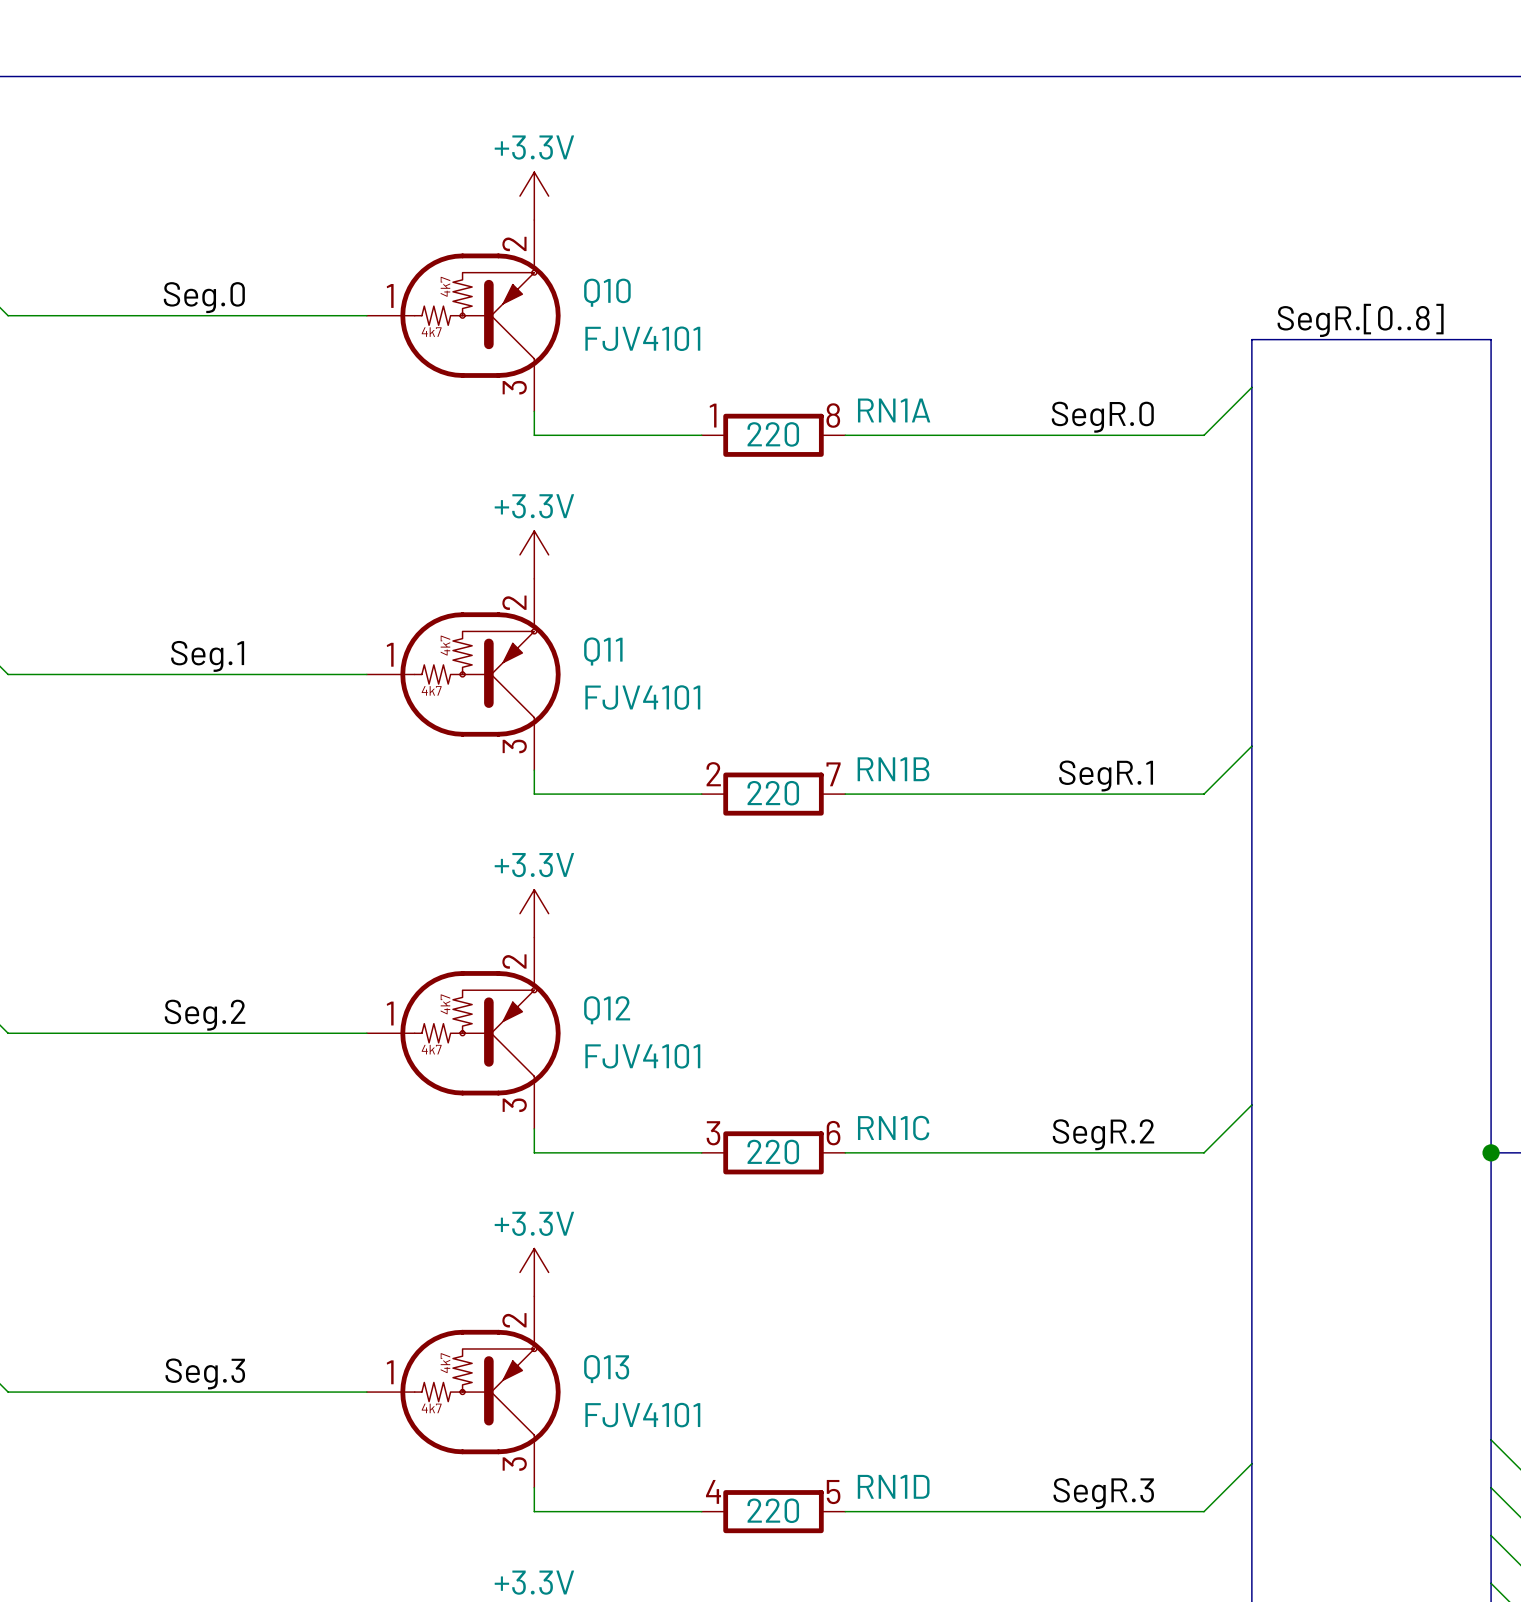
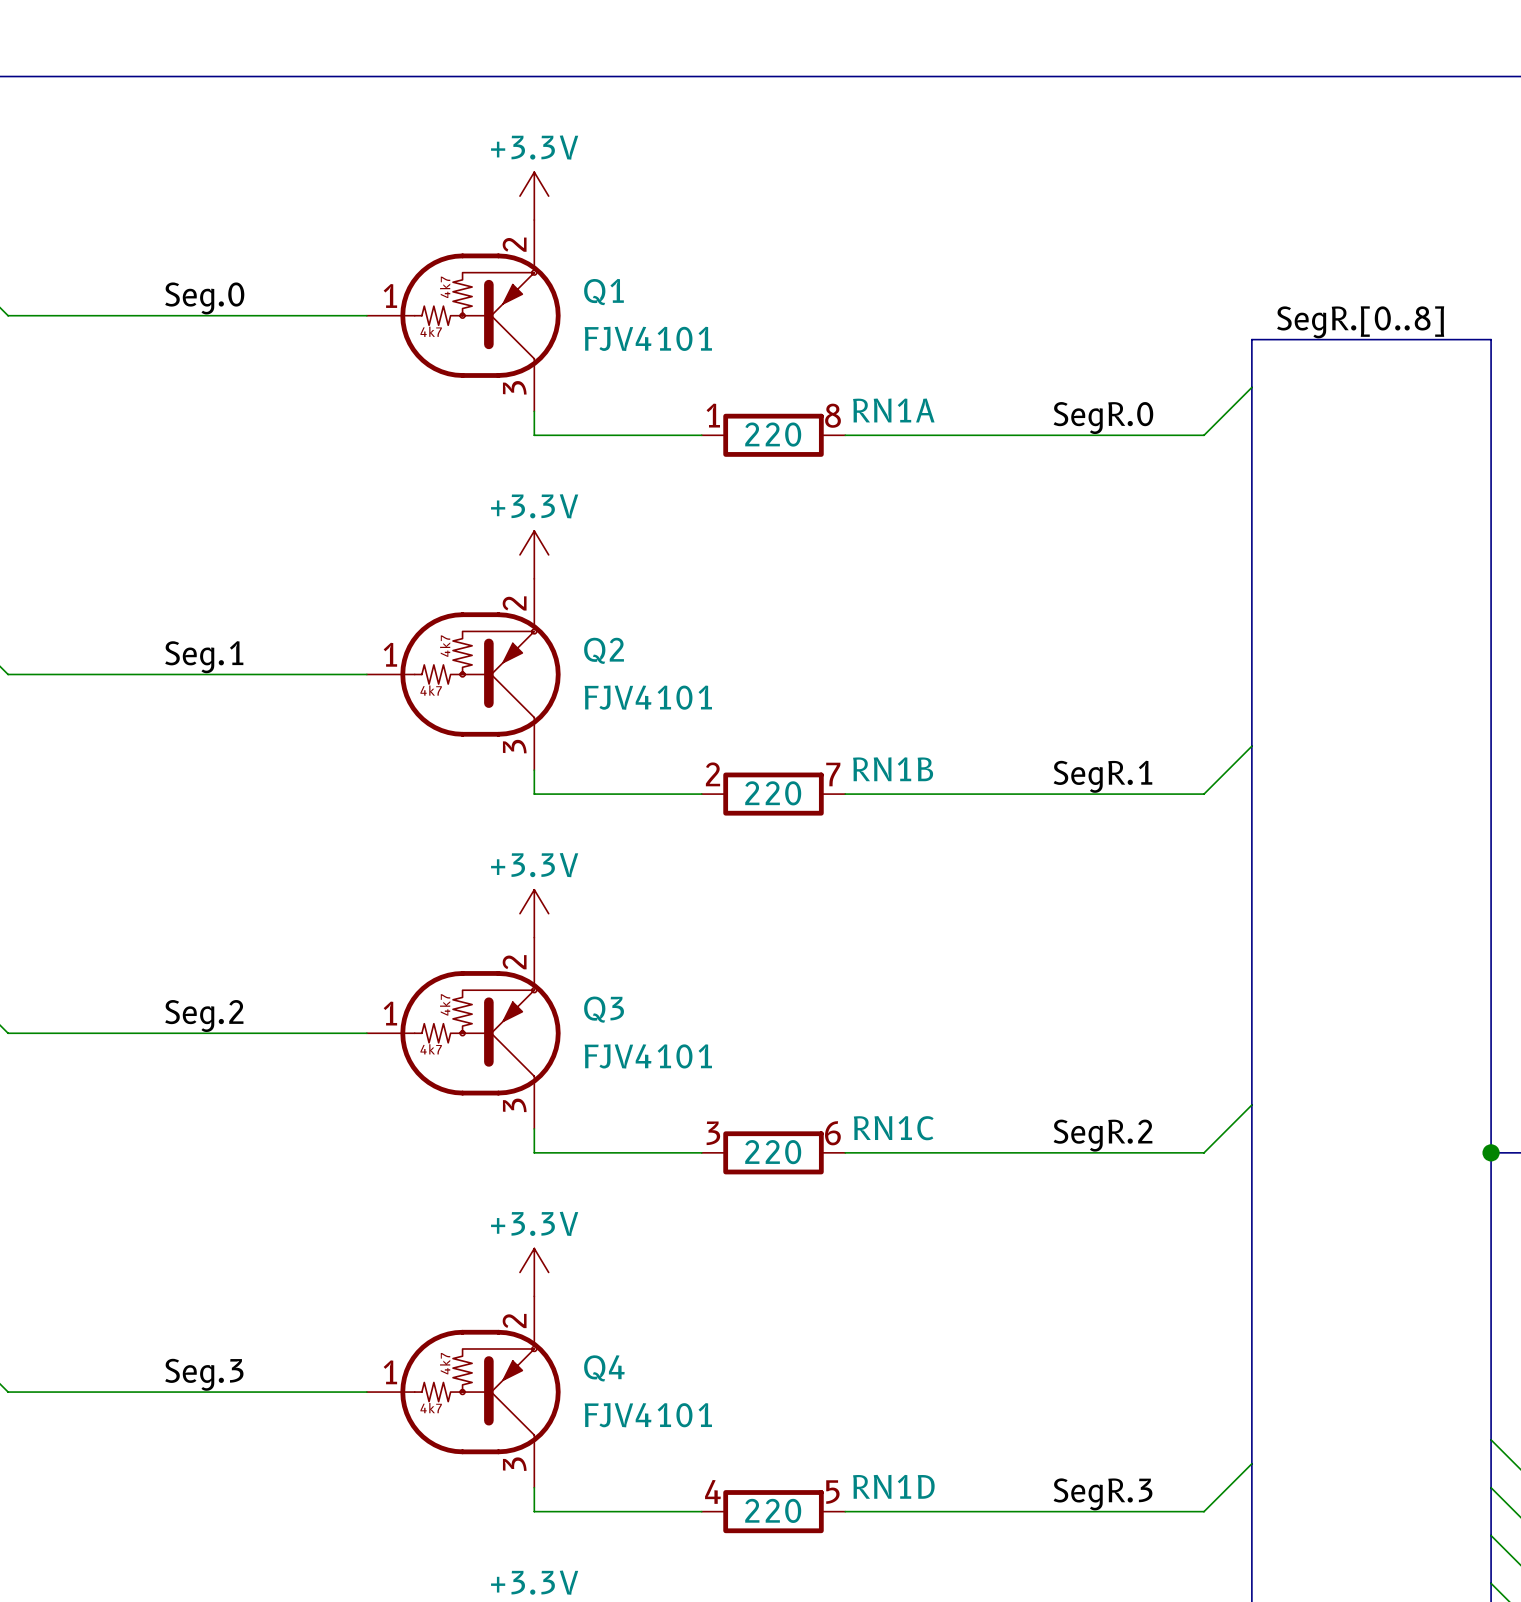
Q10 name: Q10 (607, 292) -> Q1 (603, 292)
Q11 name: Q11 (603, 651) -> Q2 (604, 650)
Q12 name: Q12 (607, 1010) -> Q3 (604, 1009)
Q13 name: Q13 (606, 1369) -> Q4 (604, 1368)

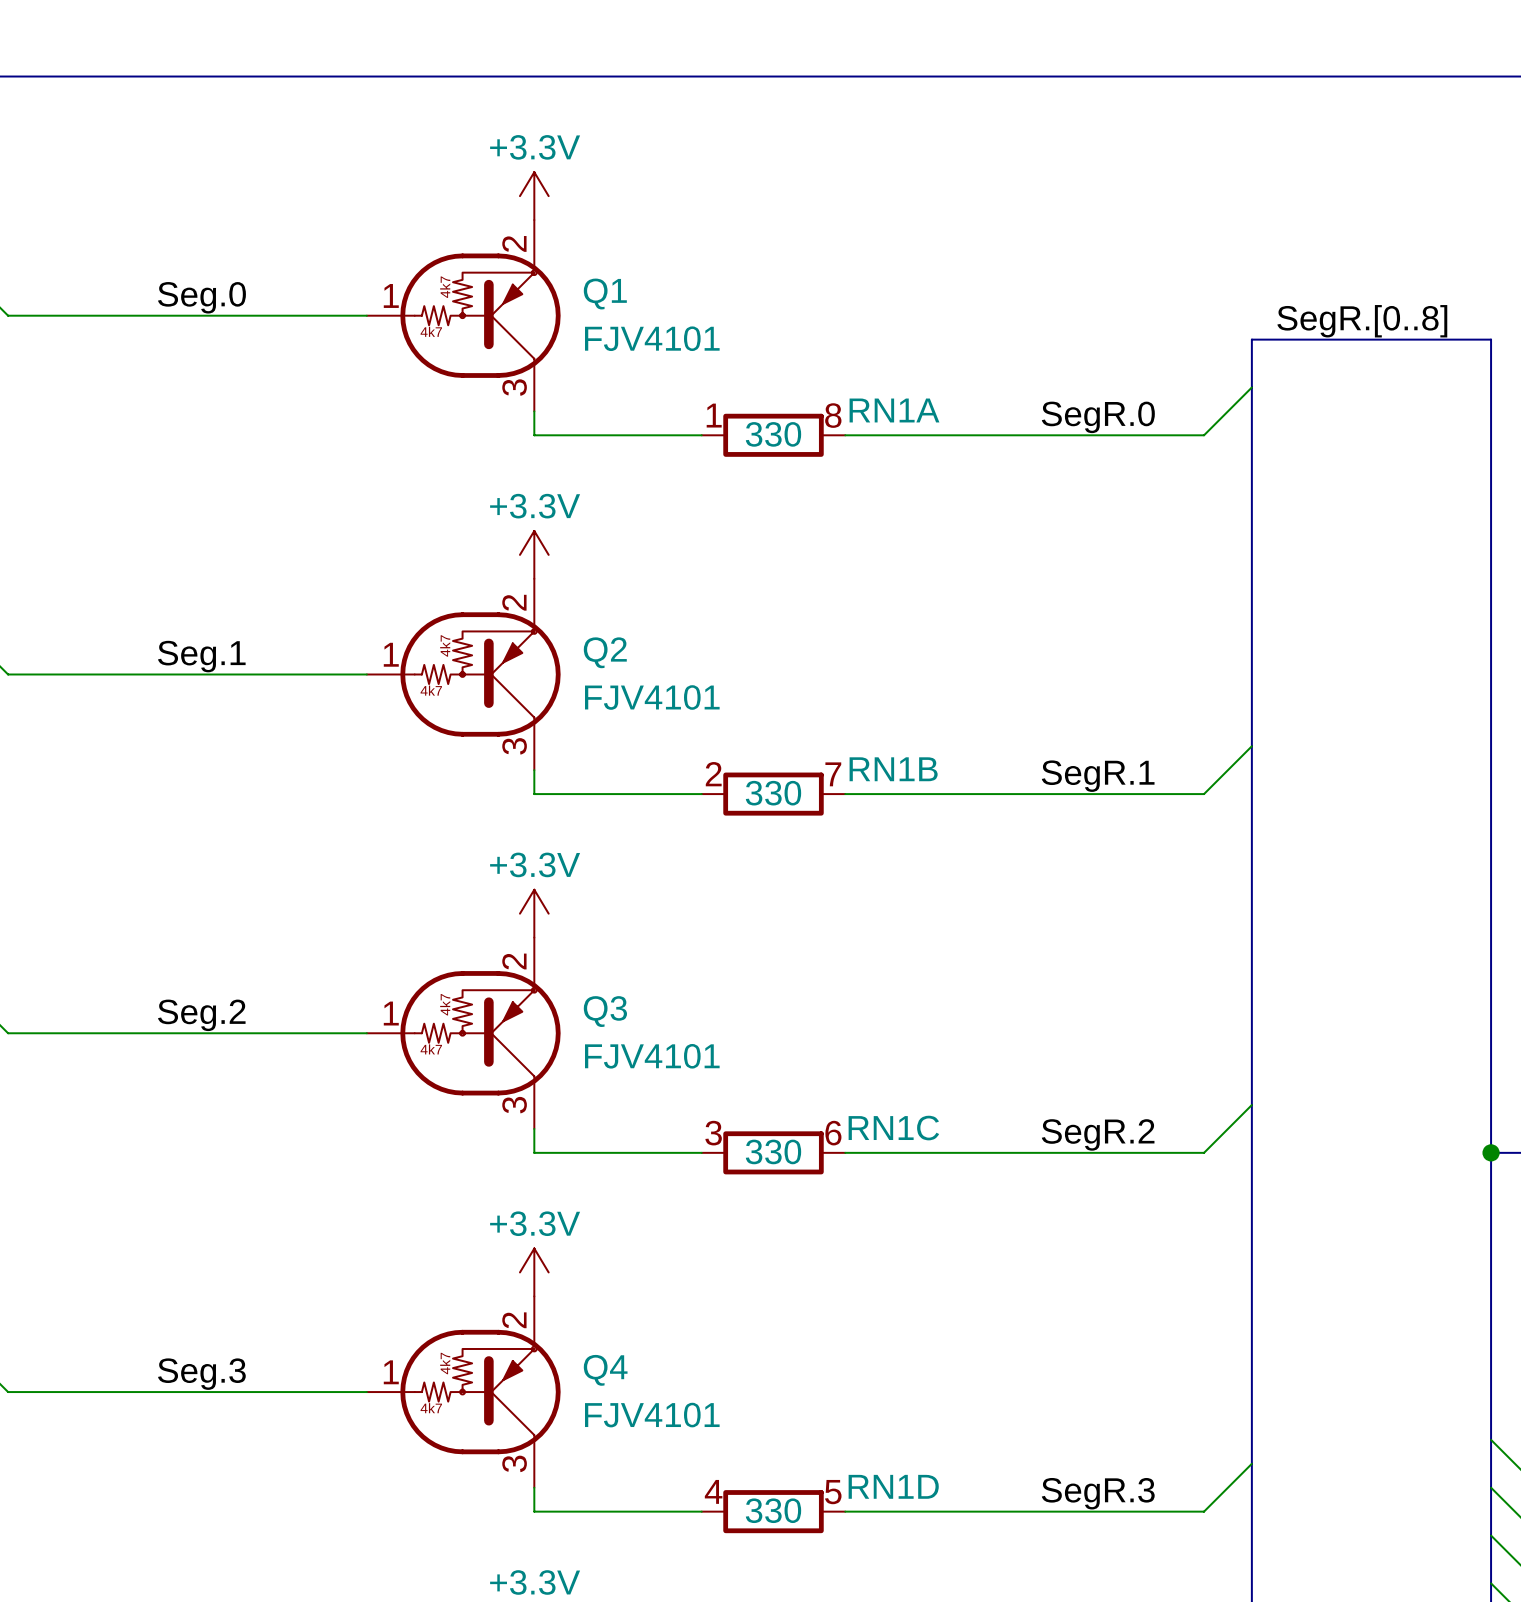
RN1A value: 220 (773, 434) -> 330 (773, 434)
RN1B value: 220 (773, 793) -> 330 (773, 793)
RN1C value: 220 (773, 1152) -> 330 (773, 1151)
RN1D value: 220 (773, 1510) -> 330 (773, 1510)

